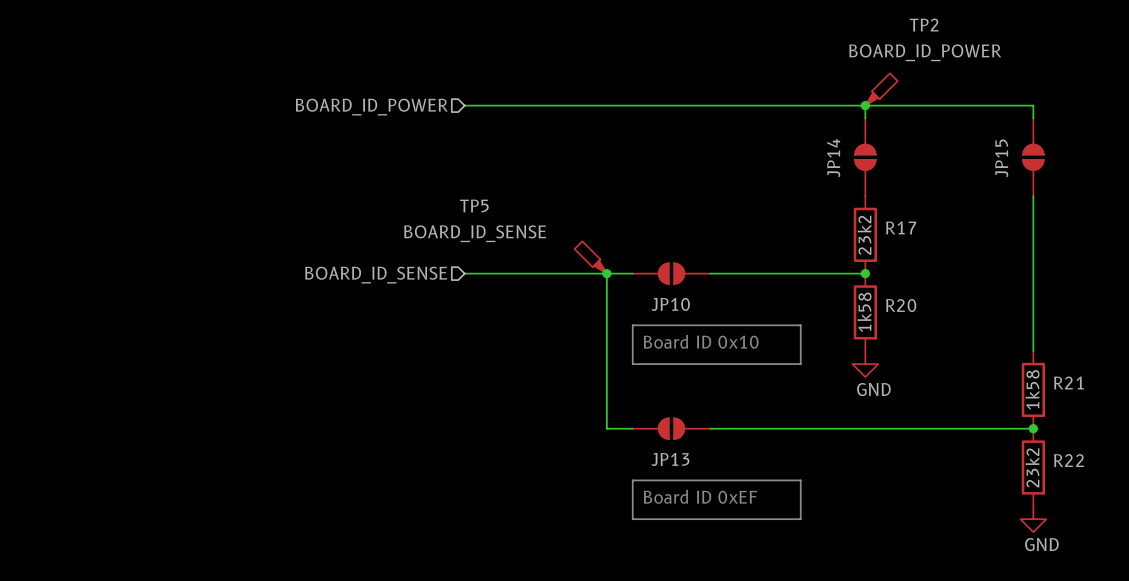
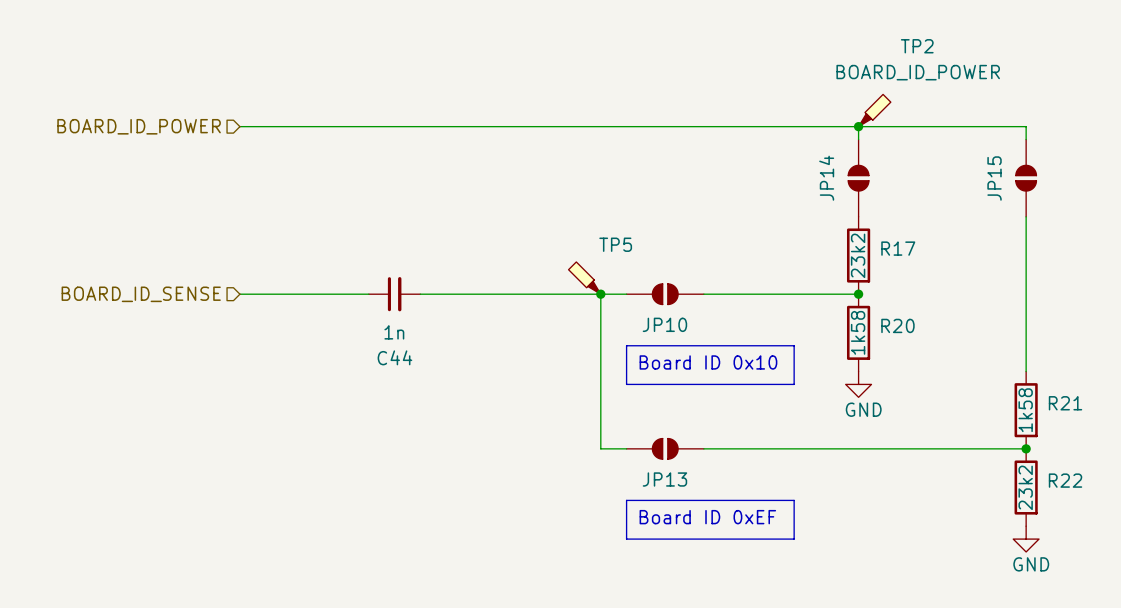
wire: none -> (239, 126) (459, 126)
hierarchical label position: BOARD_ID_POWER (371, 107) -> BOARD_ID_POWER (139, 126)
TP5 name position: TP5 (474, 205) -> TP5 (615, 244)
TP5 value: BOARD_ID_SENSE (475, 233) -> none
wire: none -> (239, 294) (368, 294)
C44: none -> 1n (394, 294)
wire: none -> (420, 294) (459, 294)
hierarchical label position: BOARD_ID_SENSE (376, 275) -> BOARD_ID_SENSE (141, 294)

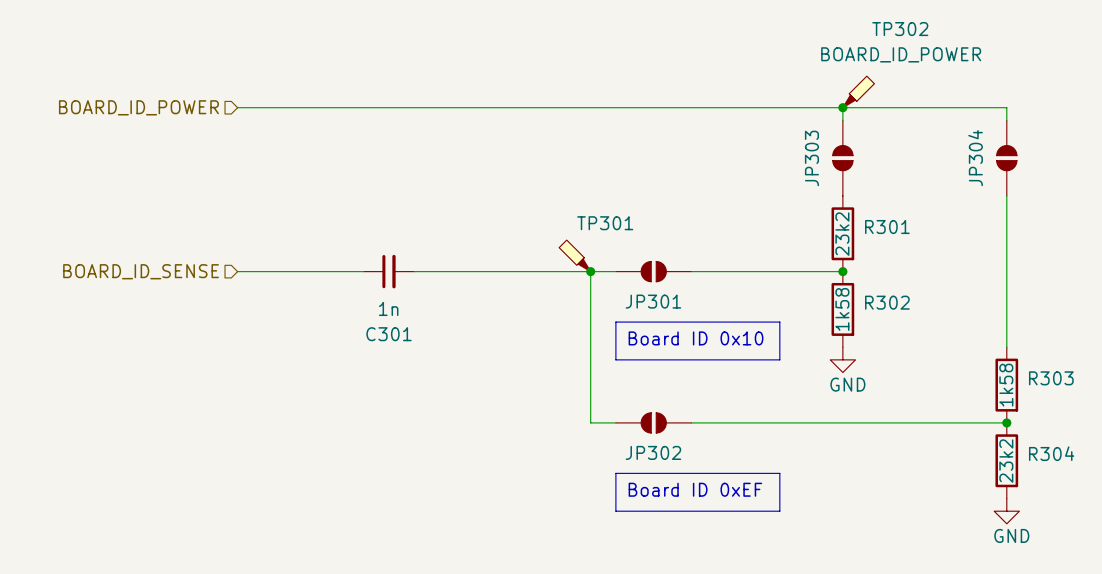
TP2 name: TP2 (917, 46) -> TP302 (900, 29)
JP14 name: JP14 (826, 178) -> JP303 (811, 158)
JP15 name: JP15 (994, 178) -> JP304 (975, 158)
TP5 name: TP5 (615, 244) -> TP301 (605, 223)
R17 name: R17 (898, 248) -> R301 (887, 227)
JP10 name: JP10 (664, 324) -> JP301 (653, 301)
R20 name: R20 (897, 325) -> R302 (887, 302)
C44 name: C44 (394, 357) -> C301 (389, 334)
R21 name: R21 (1065, 403) -> R303 (1051, 378)
JP13 name: JP13 (664, 479) -> JP302 (653, 452)
R22 name: R22 (1065, 480) -> R304 (1051, 453)

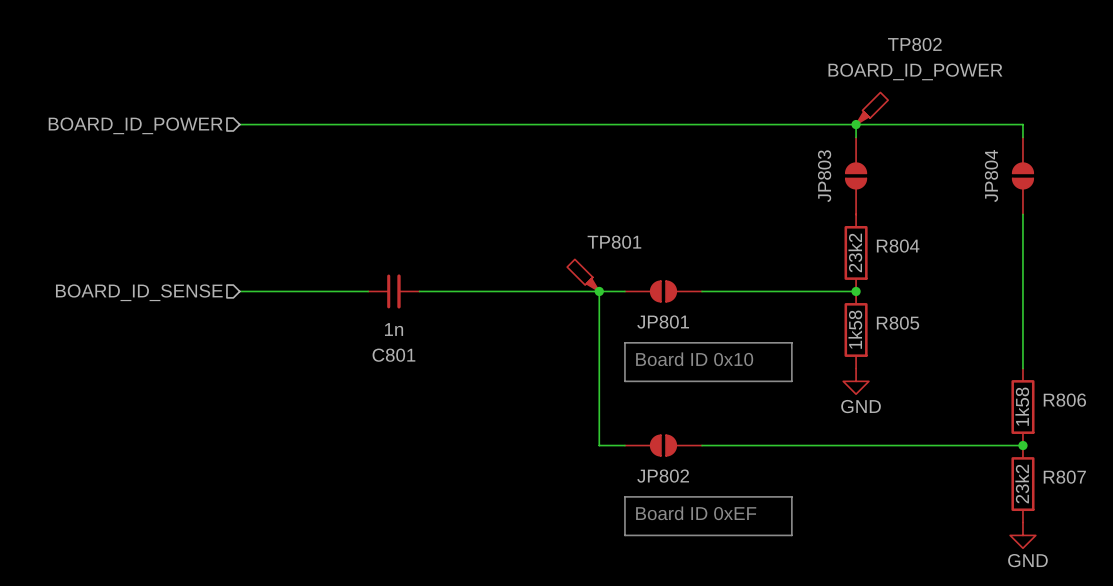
TP302 name: TP302 (900, 29) -> TP802 (914, 44)
JP303 name: JP303 (811, 158) -> JP803 (824, 176)
JP304 name: JP304 (975, 158) -> JP804 (991, 176)
TP301 name: TP301 (605, 223) -> TP801 (614, 242)
R301 name: R301 (887, 227) -> R804 (898, 246)
JP301 name: JP301 (653, 301) -> JP801 (663, 322)
R302 name: R302 (887, 302) -> R805 (898, 323)
C301 name: C301 (389, 334) -> C801 (393, 355)
R303 name: R303 (1051, 378) -> R806 (1064, 400)
JP302 name: JP302 (653, 452) -> JP802 (663, 476)
R304 name: R304 (1051, 453) -> R807 (1064, 477)

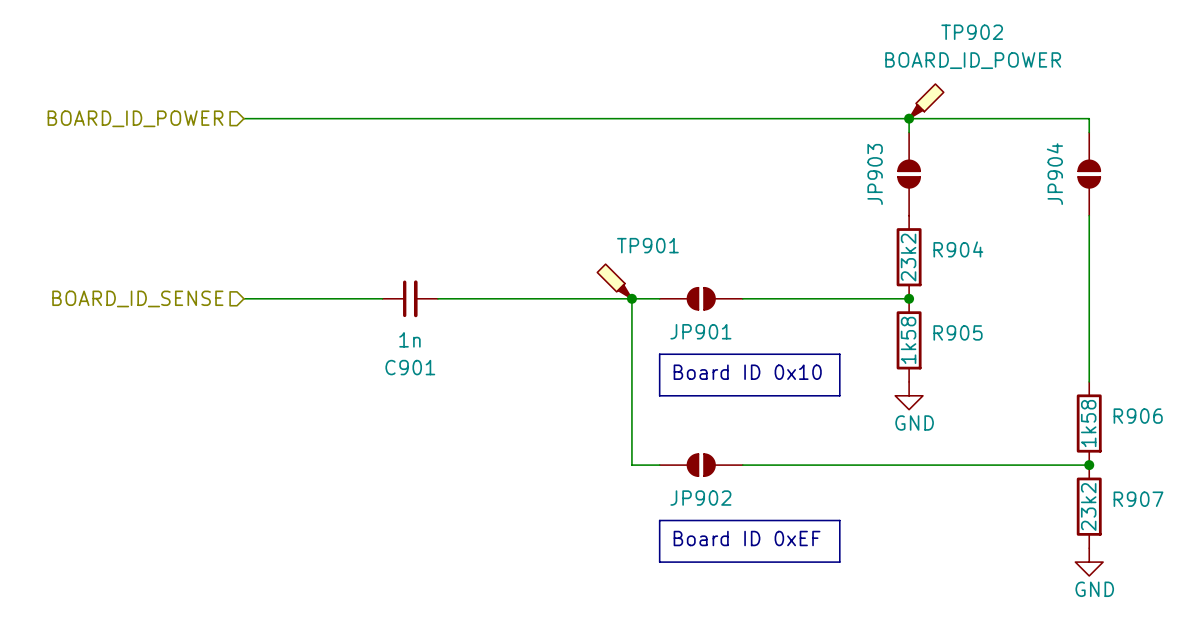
TP802 name: TP802 (914, 44) -> TP902 (972, 32)
JP803 name: JP803 (824, 176) -> JP903 (875, 174)
JP804 name: JP804 (991, 176) -> JP904 (1054, 174)
TP801 name: TP801 (614, 242) -> TP901 (647, 245)
R804 name: R804 (898, 246) -> R904 (958, 249)
JP801 name: JP801 (663, 322) -> JP901 (700, 331)
R805 name: R805 (898, 323) -> R905 (958, 332)
C801 name: C801 (393, 355) -> C901 (410, 367)
R806 name: R806 (1064, 400) -> R906 (1138, 416)
JP802 name: JP802 (663, 476) -> JP902 (700, 498)
R807 name: R807 (1064, 477) -> R907 (1138, 499)

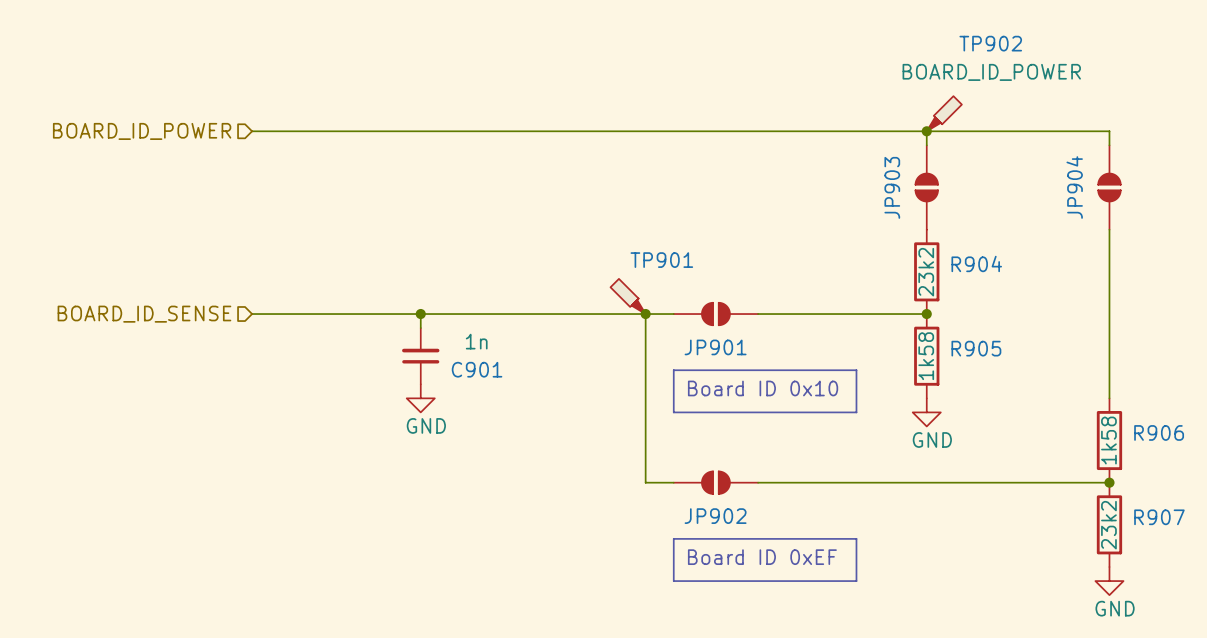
wire: none -> (420, 314) (420, 328)
C901 rotation: 0° (410, 298) -> 90° counterclockwise (420, 356)
C901 position: (410, 298) -> (420, 356)
junction: none -> (420, 314)
power symbol: none -> GND (420, 398)

